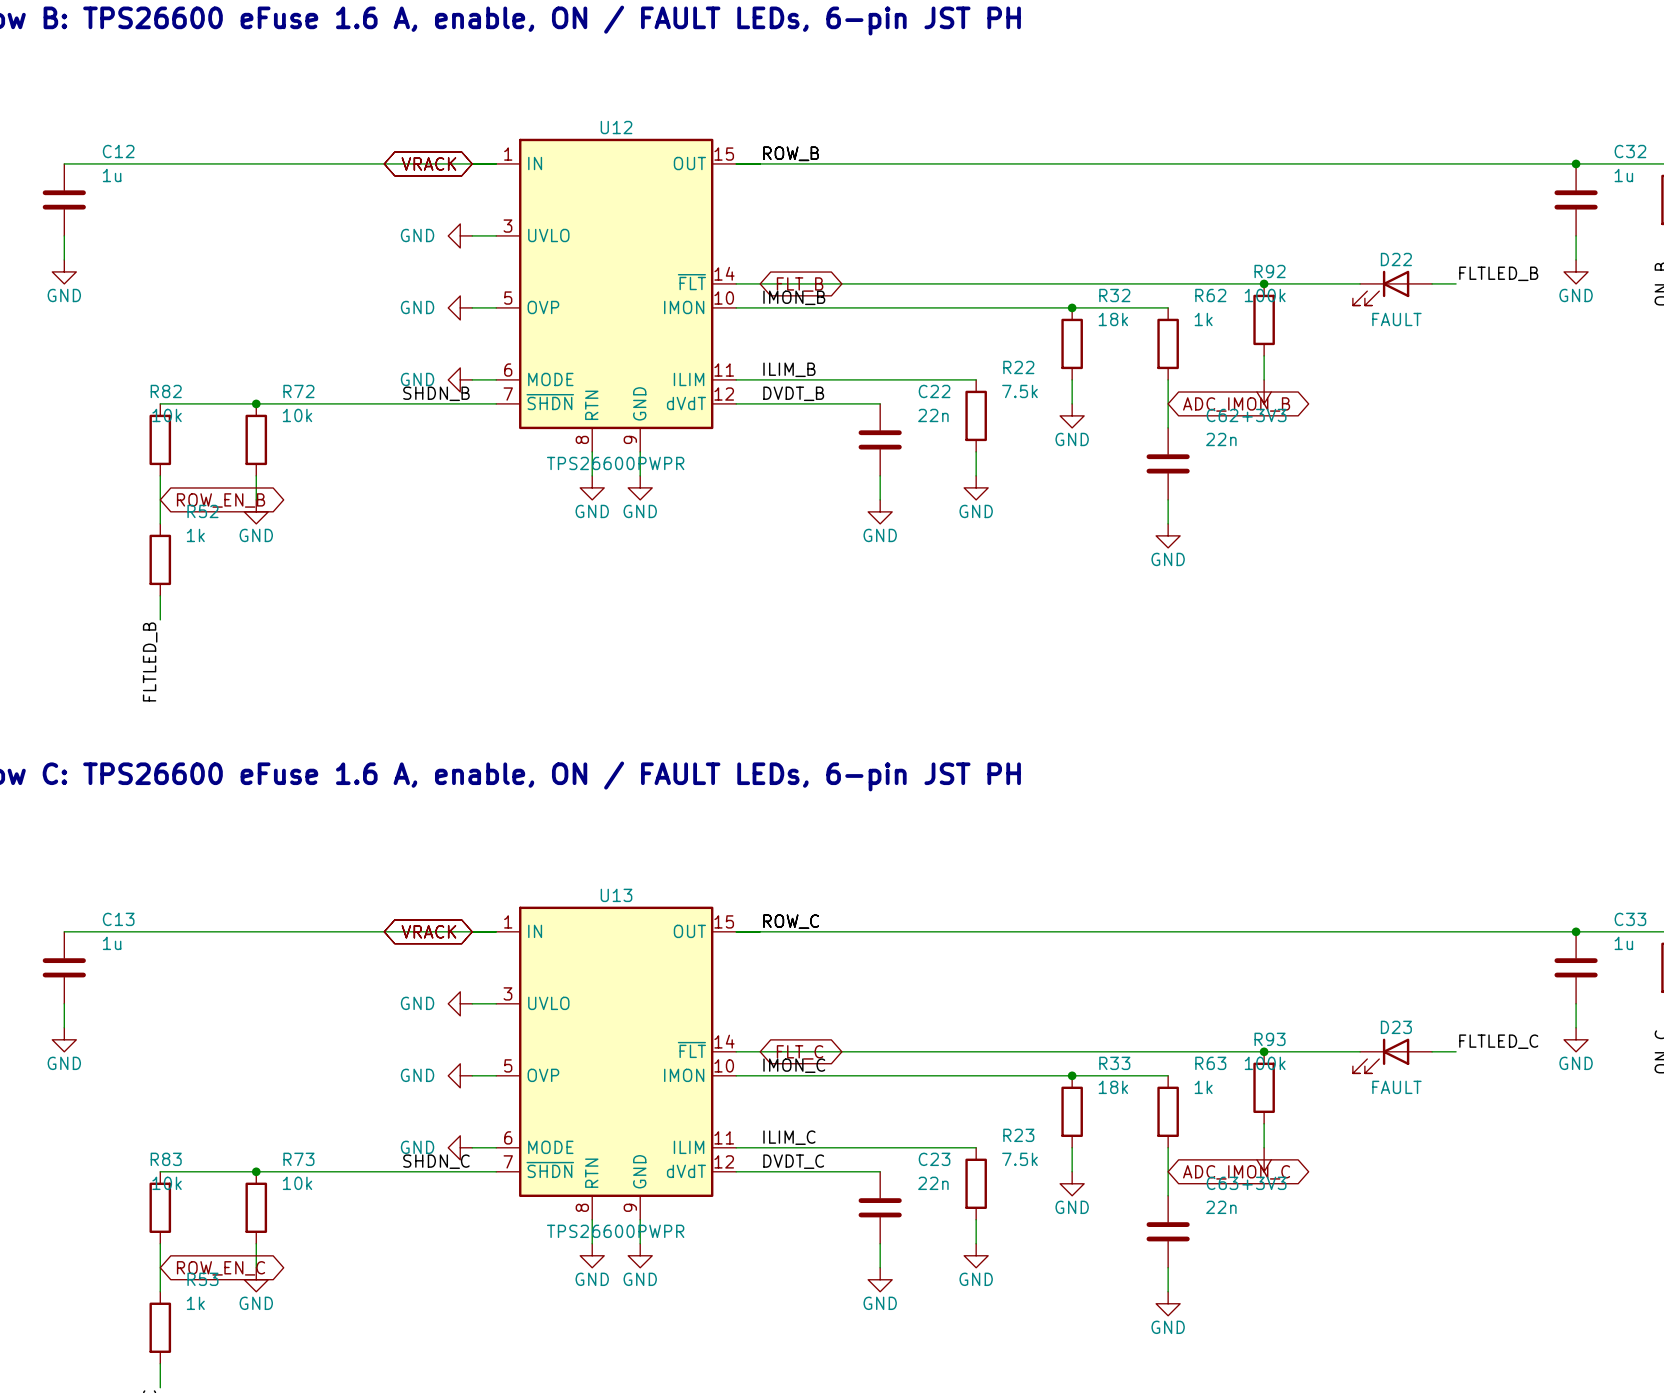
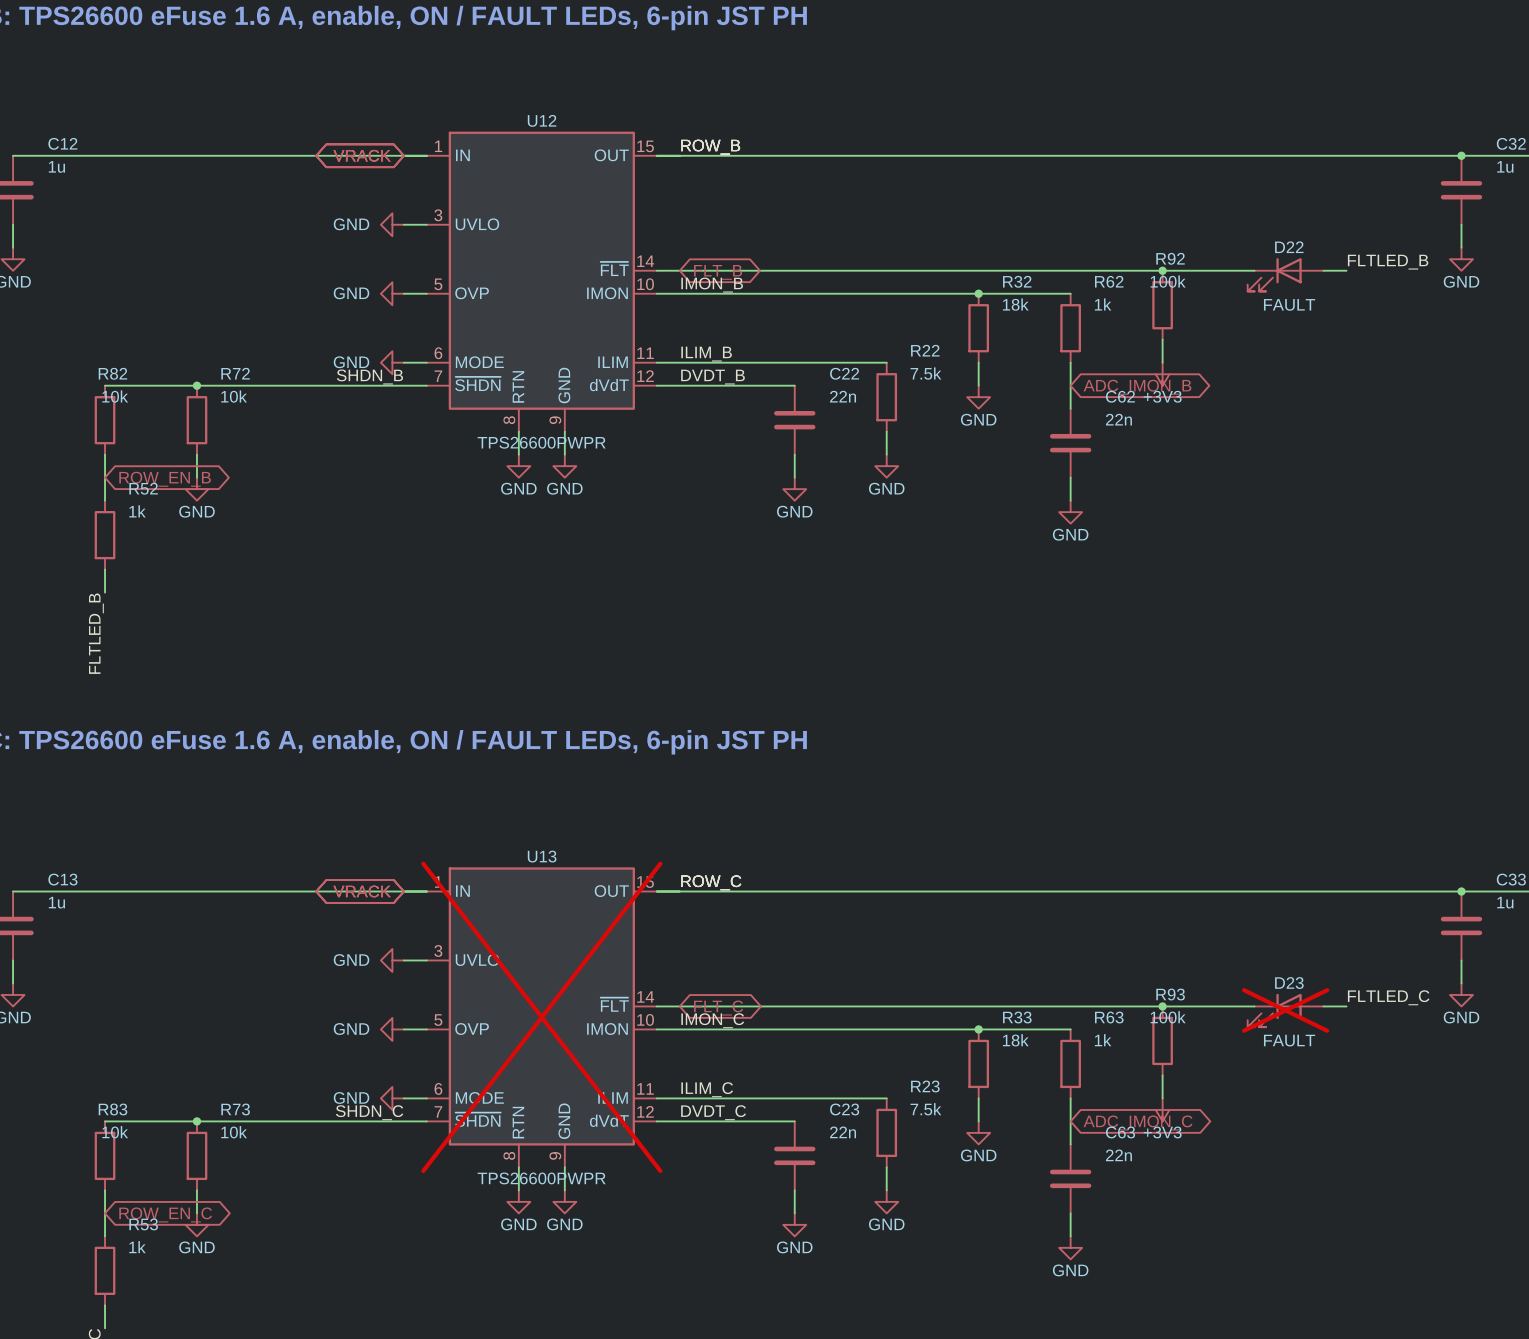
D23 do-not-place cross: none -> (1285, 1010)
U13 do-not-place cross: none -> (541, 1017)

